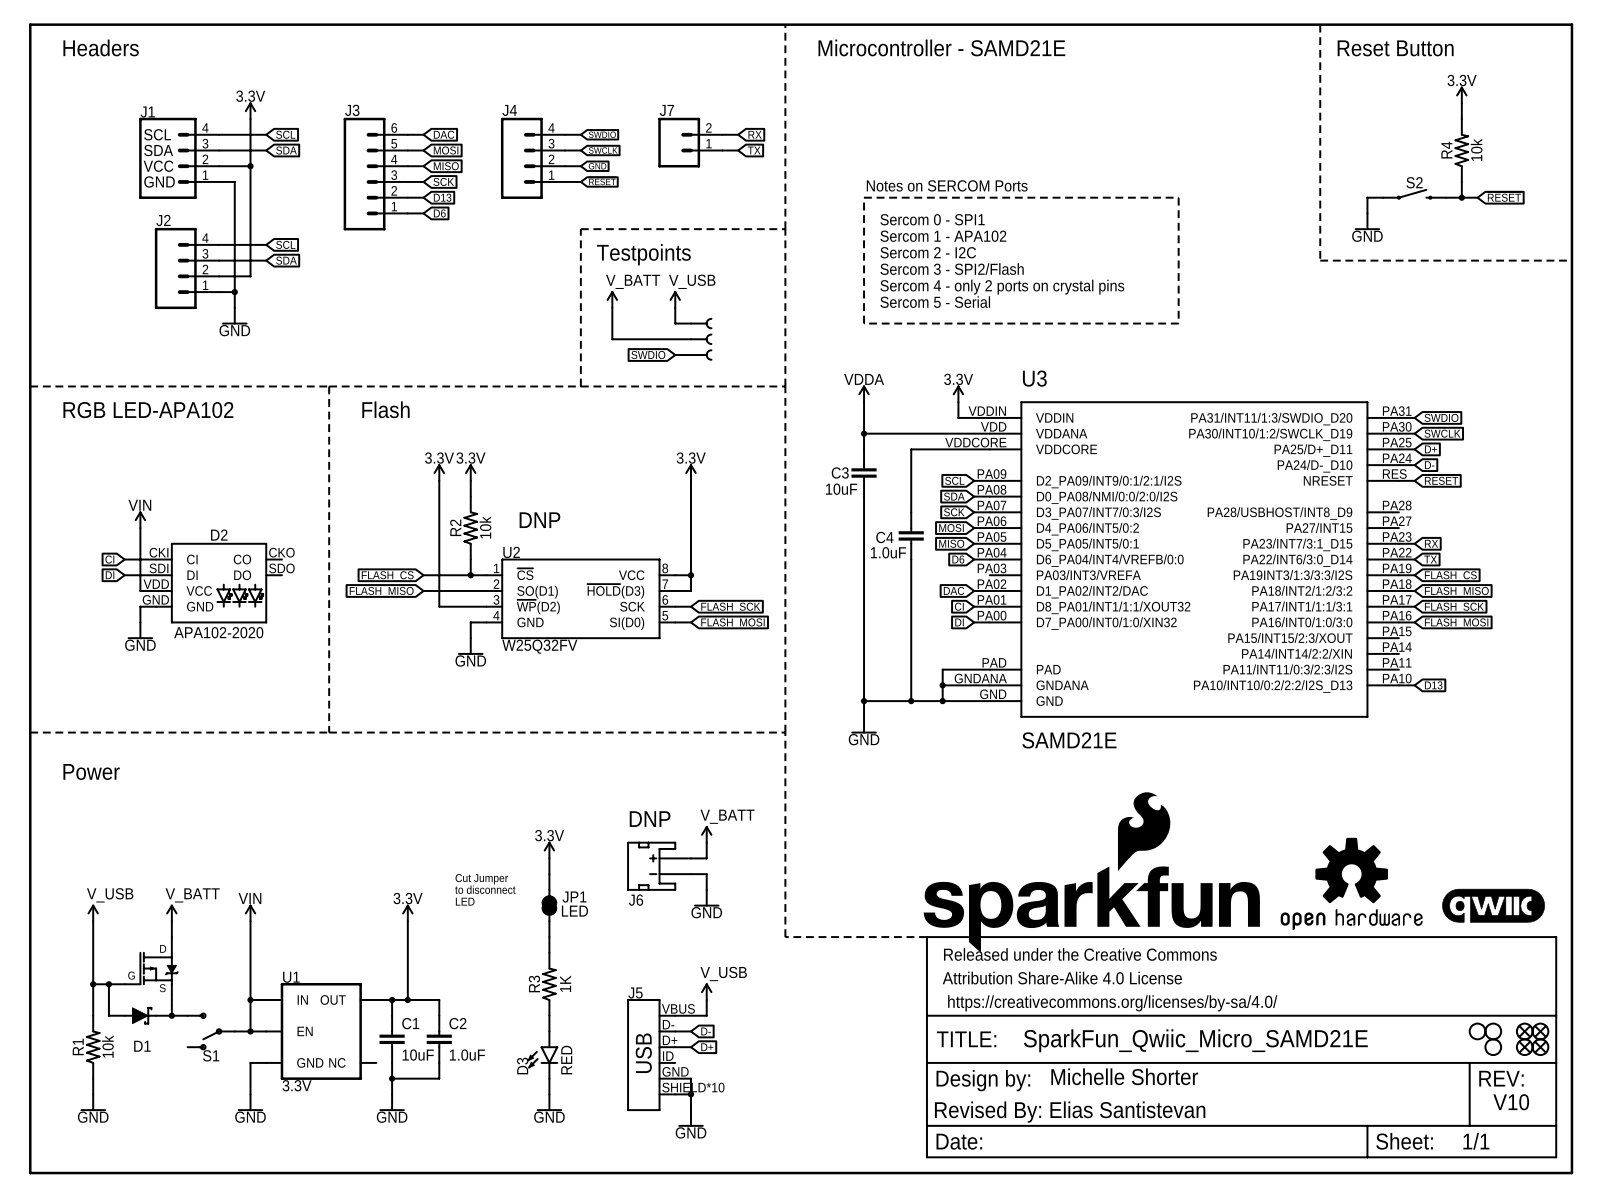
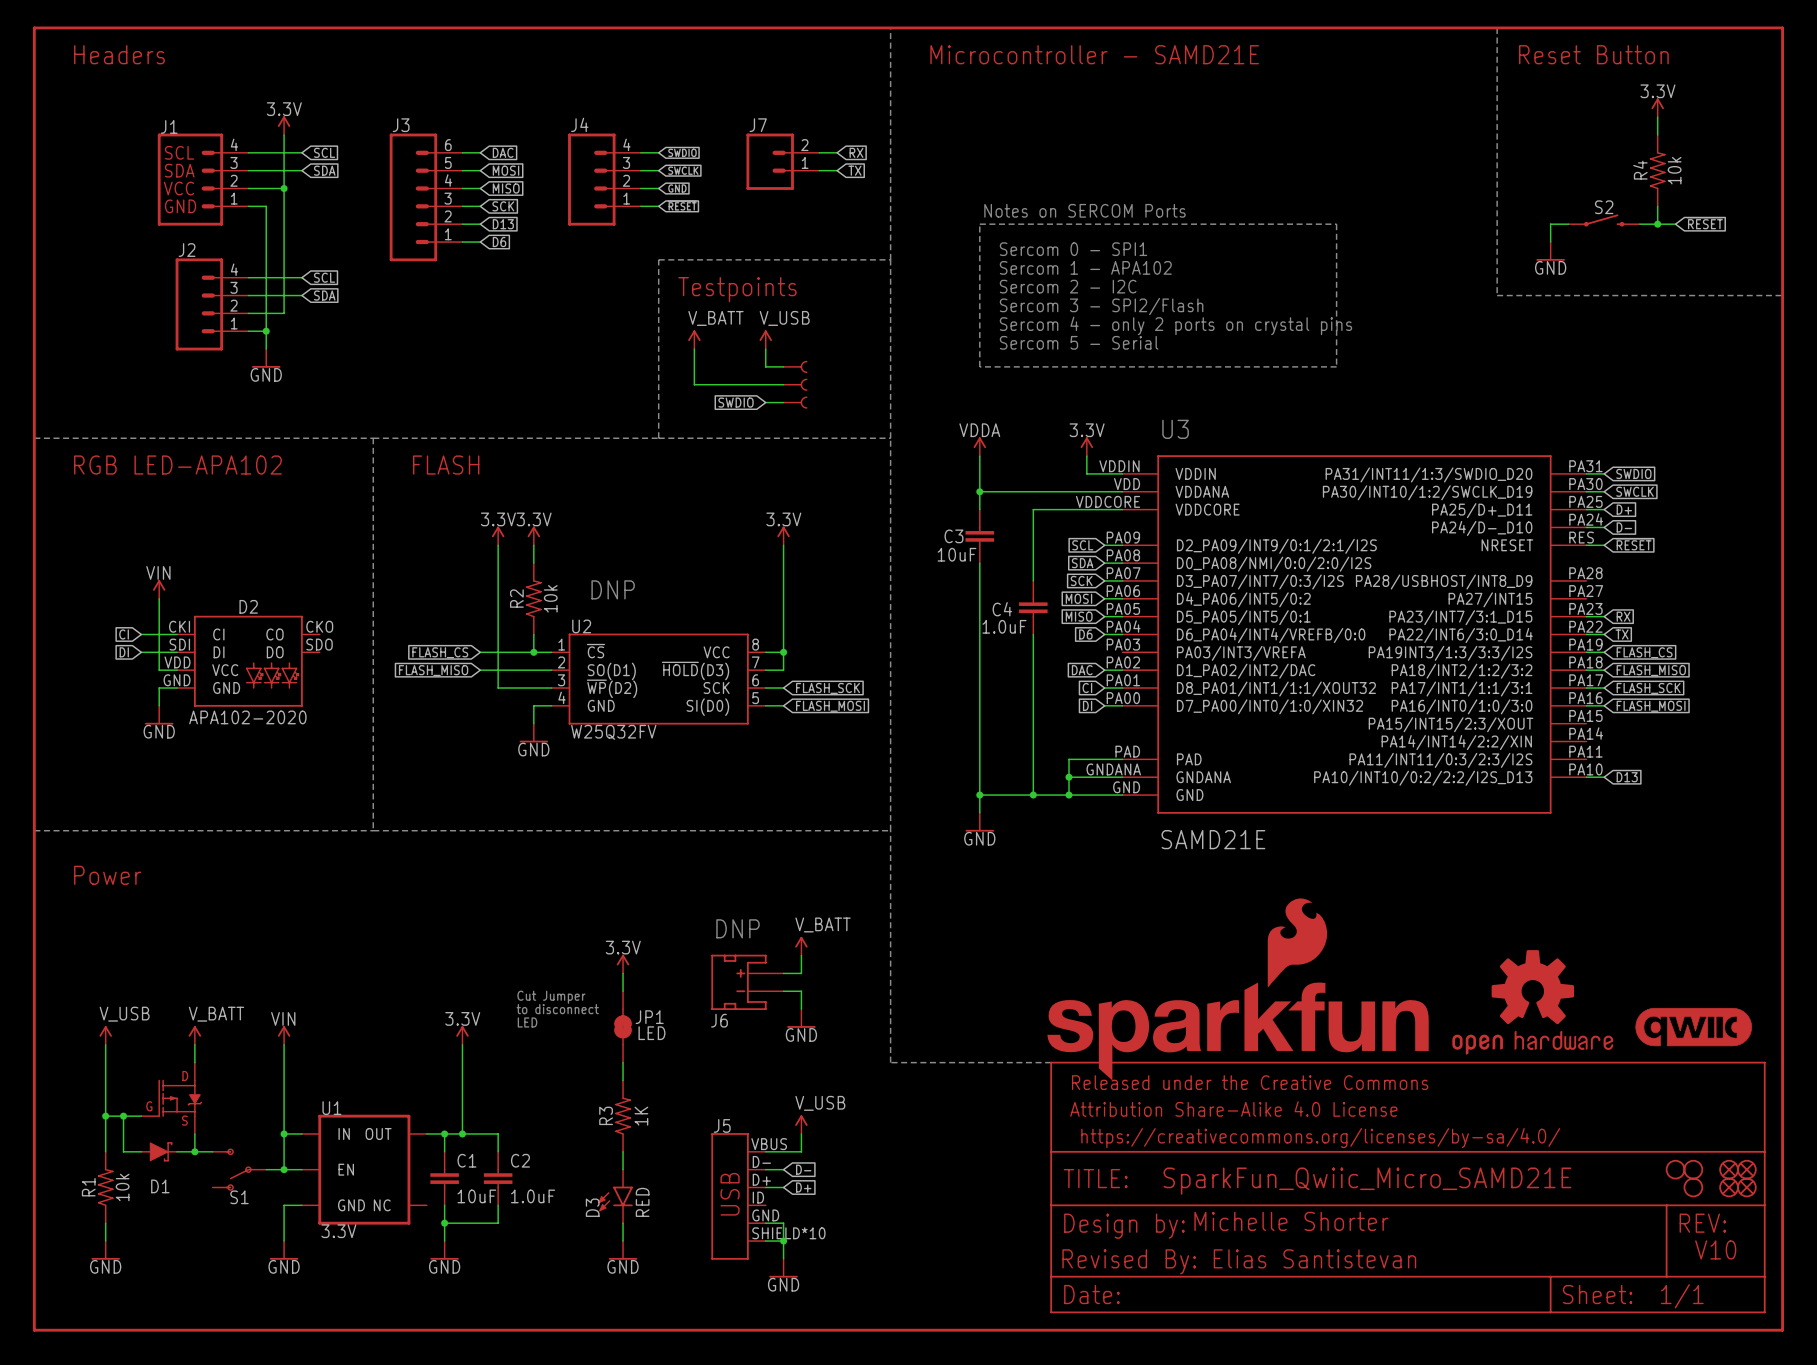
text: Flash (385, 409) -> FLASH (446, 465)

